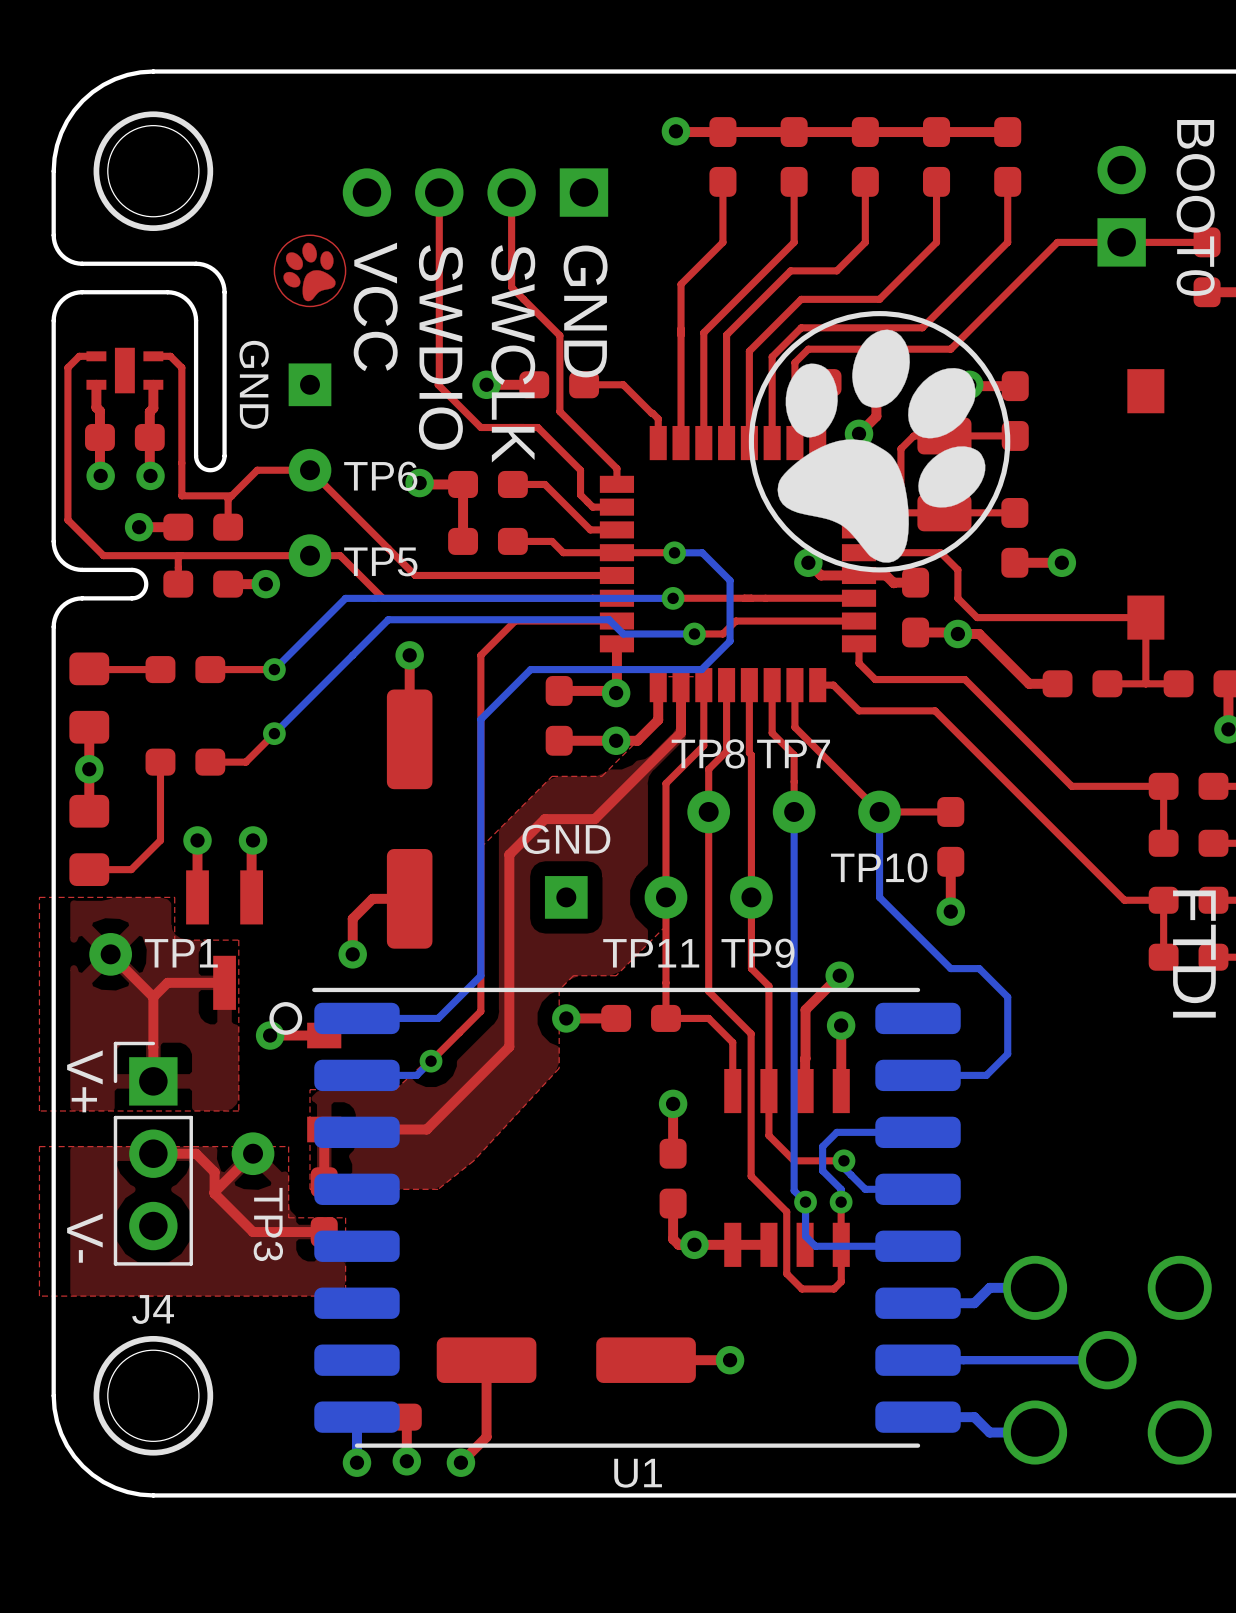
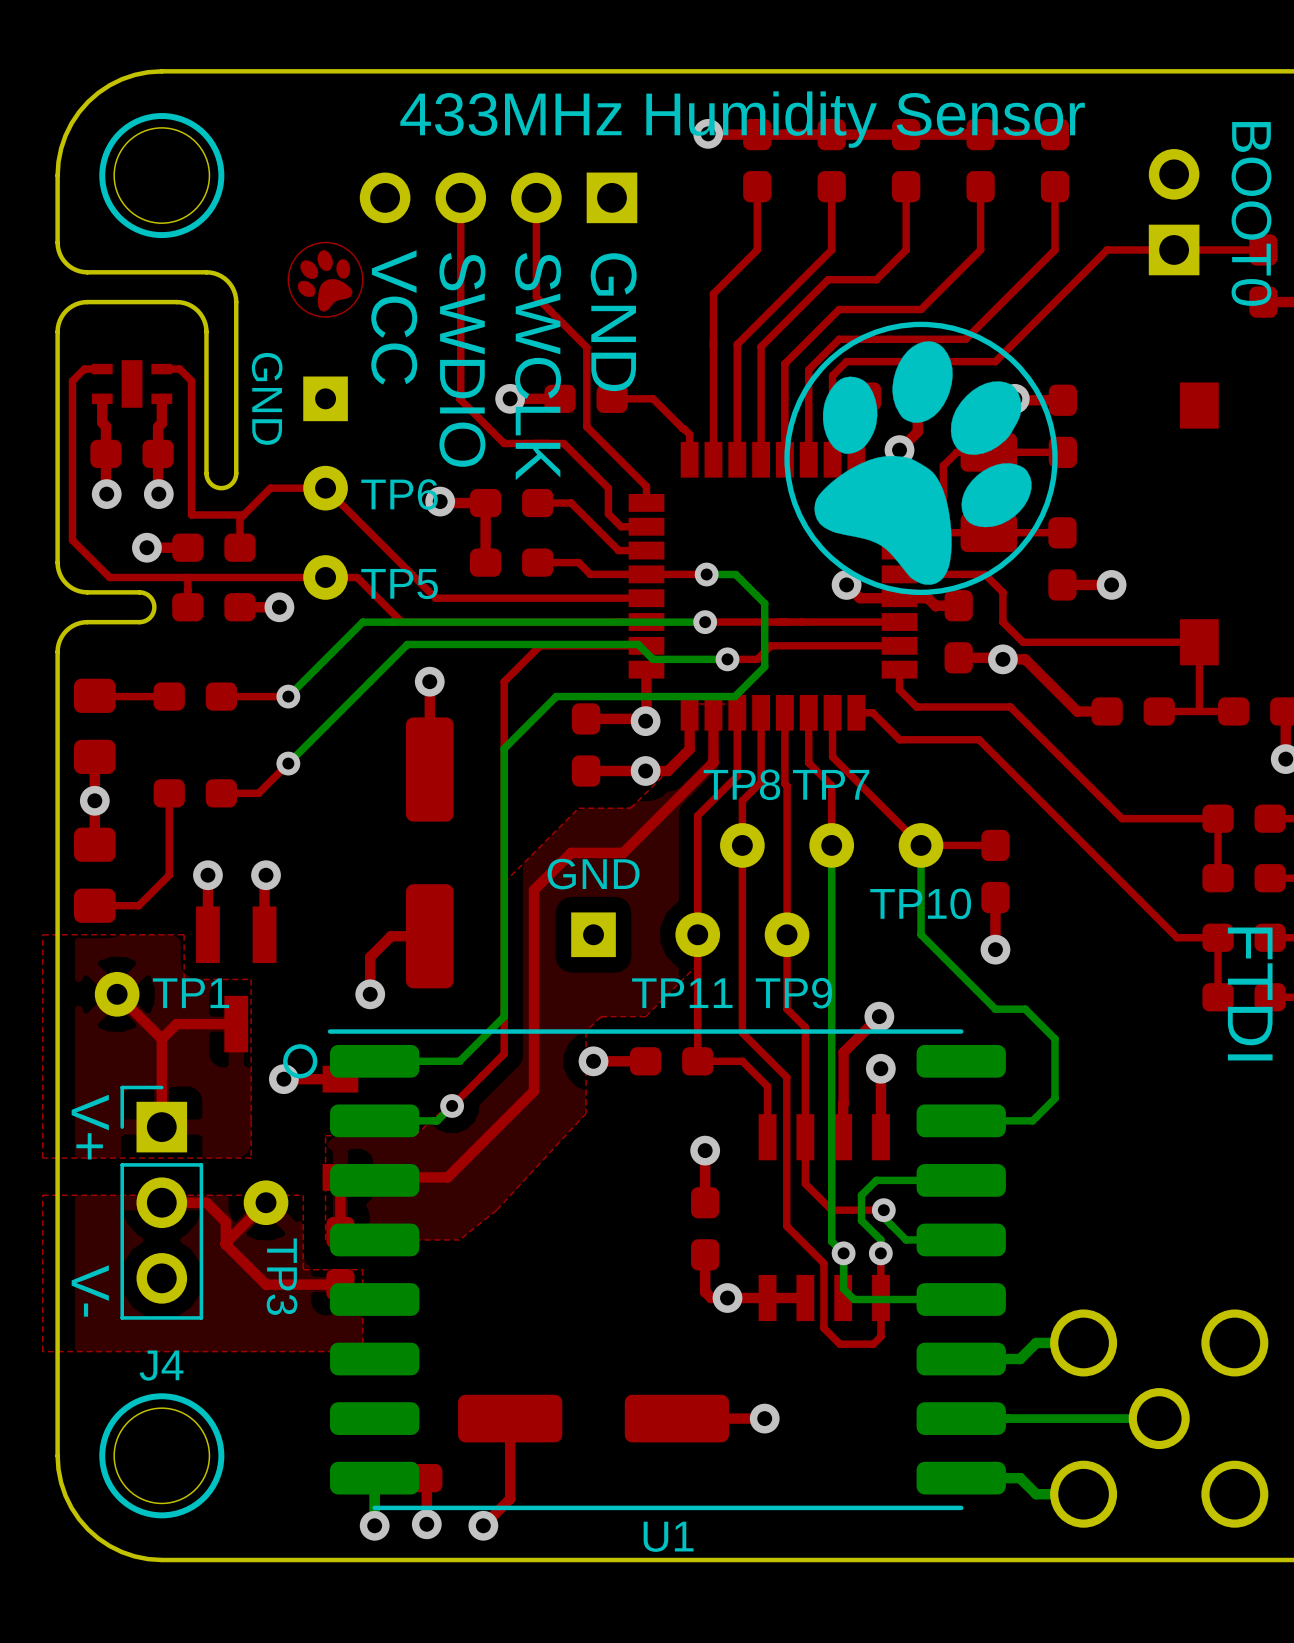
text: none -> 433MHz Humidity Sensor (742, 119)

